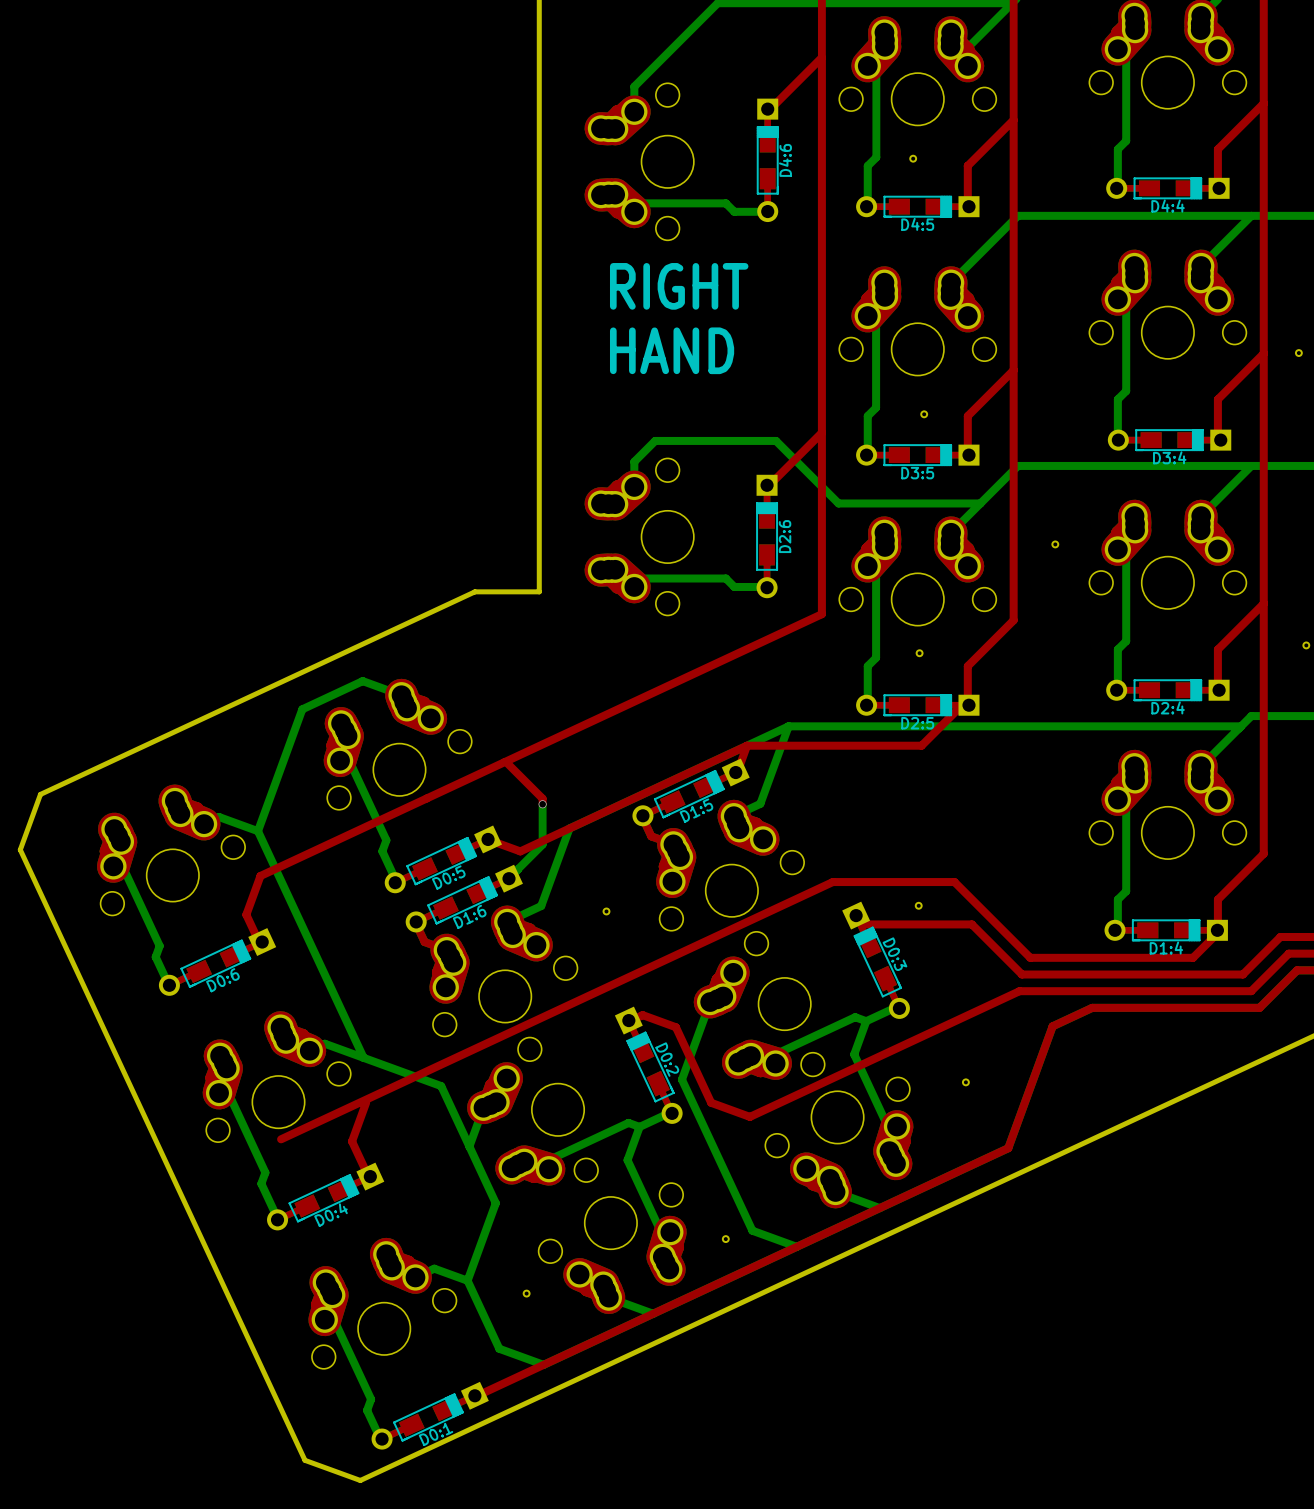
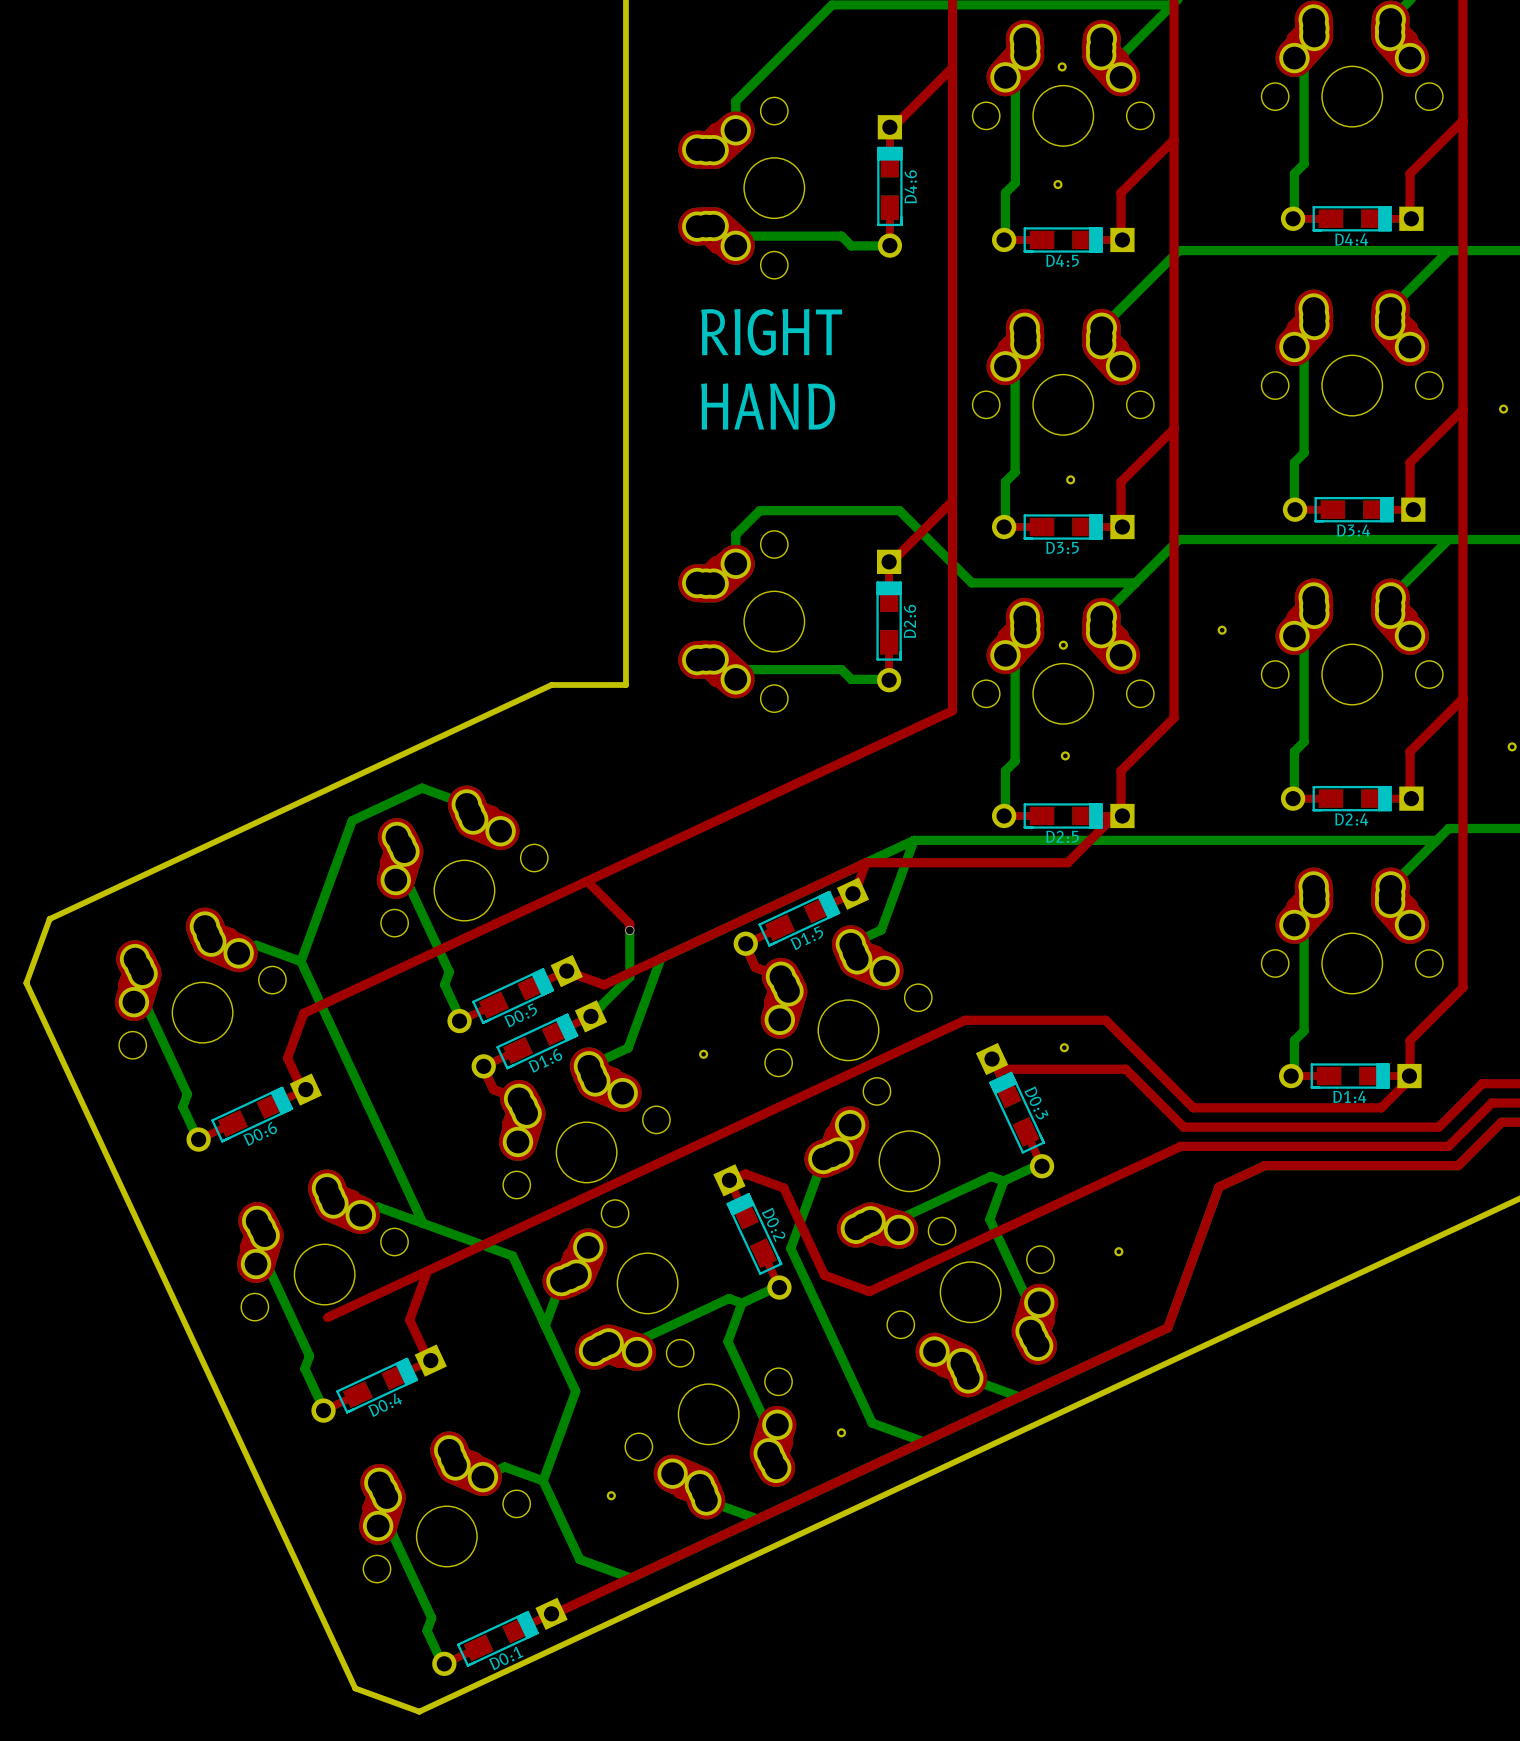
part: none -> (1062, 66)
part: none -> (1063, 645)

